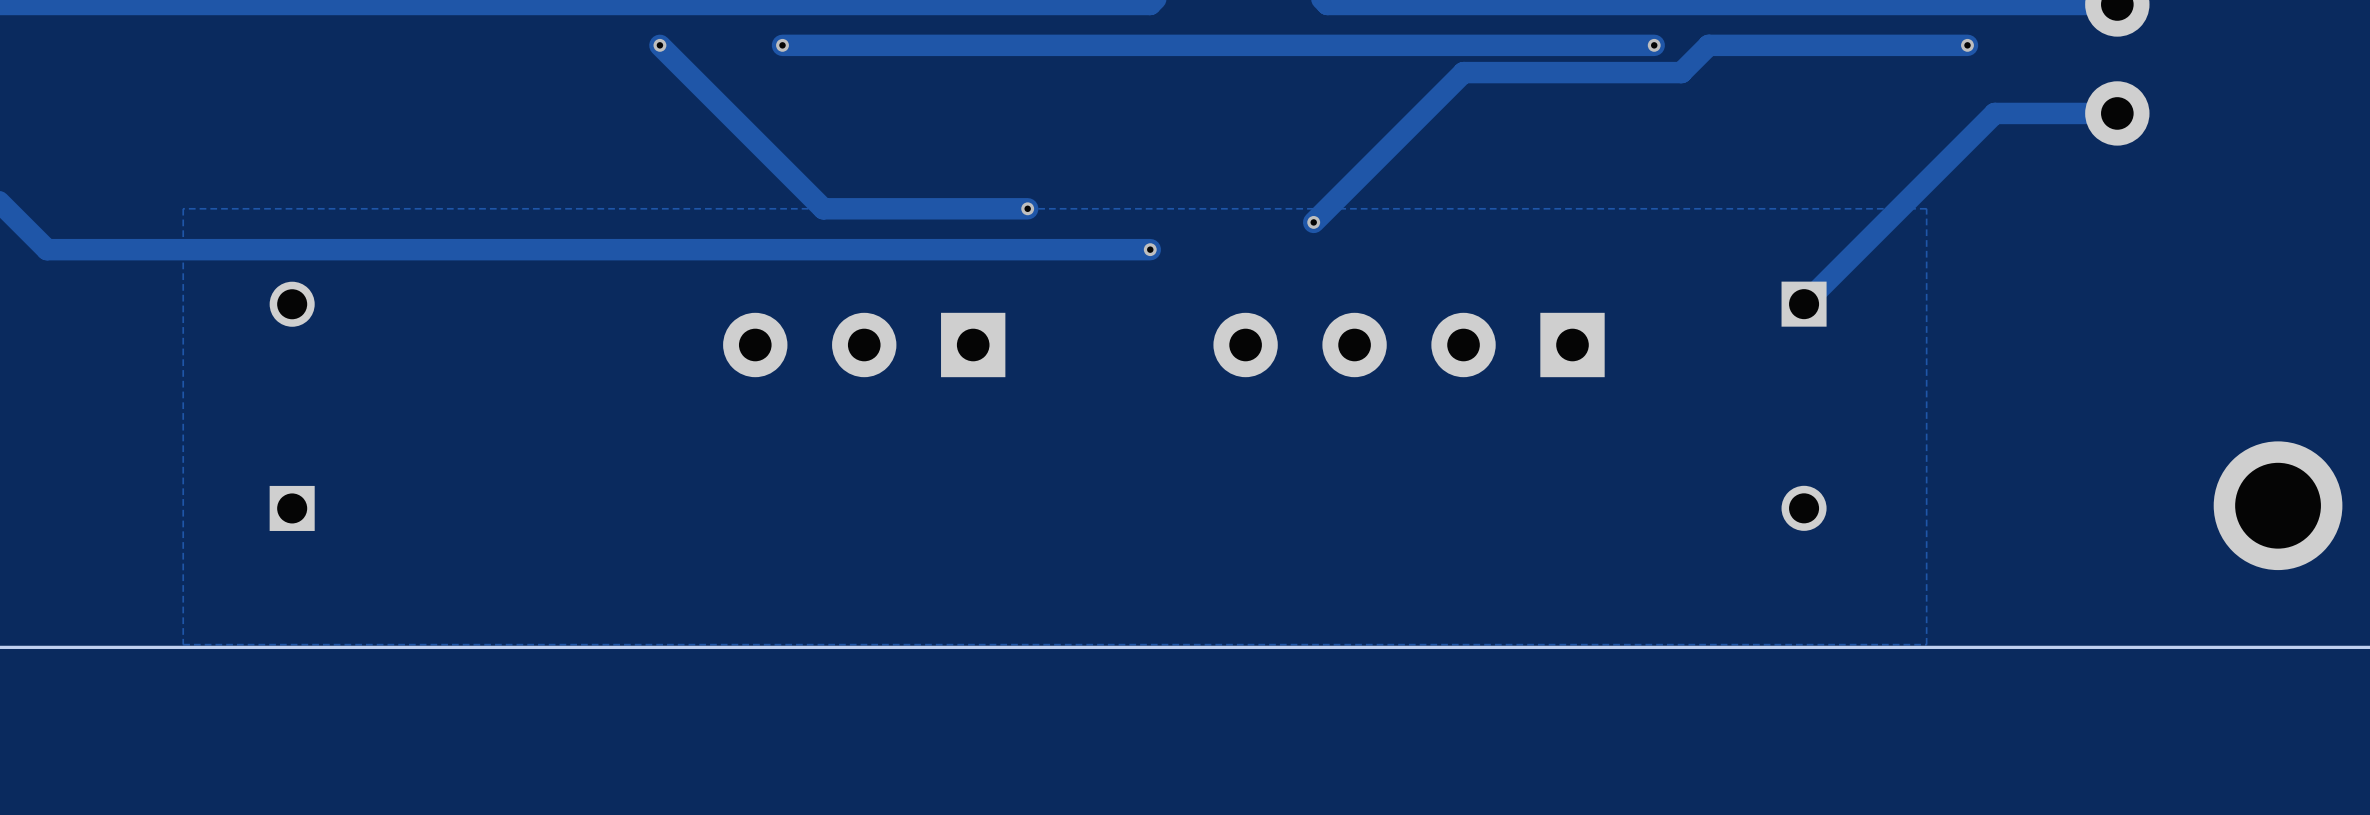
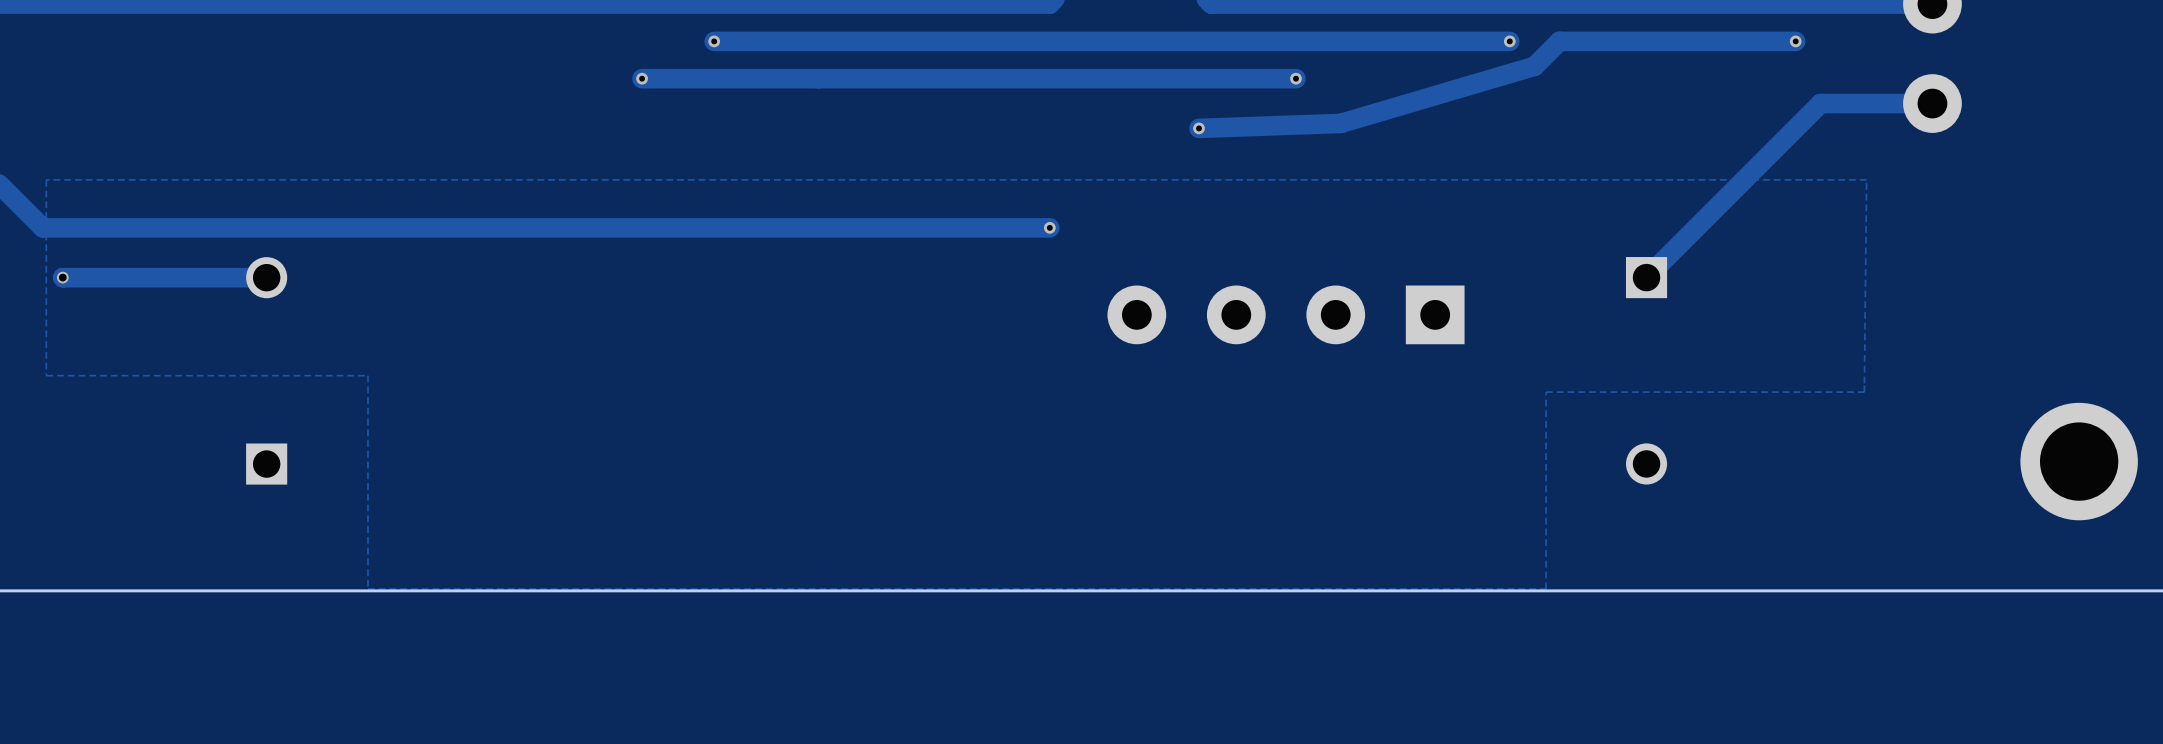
track: (659, 45) (823, 208) (1027, 208) -> none
via position: (659, 45) -> (642, 78)
track: (1681, 72) (1463, 72) (1313, 222) -> (1534, 66) (1340, 123) (1199, 128)
track: none -> (1295, 78) (642, 78)
via: none -> (1295, 78)
via: (1027, 208) -> none
zone outline: (1926, 208) (183, 208) (183, 644) (1926, 644) (1926, 208) -> (1866, 179) (1864, 392) (1546, 392) (1546, 589) (367, 589) (367, 375) (46, 375) (46, 179) (1866, 179)
via position: (1313, 222) -> (1199, 128)
via: none -> (62, 277)
track: none -> (266, 277) (62, 277)
part: (864, 345) -> none

